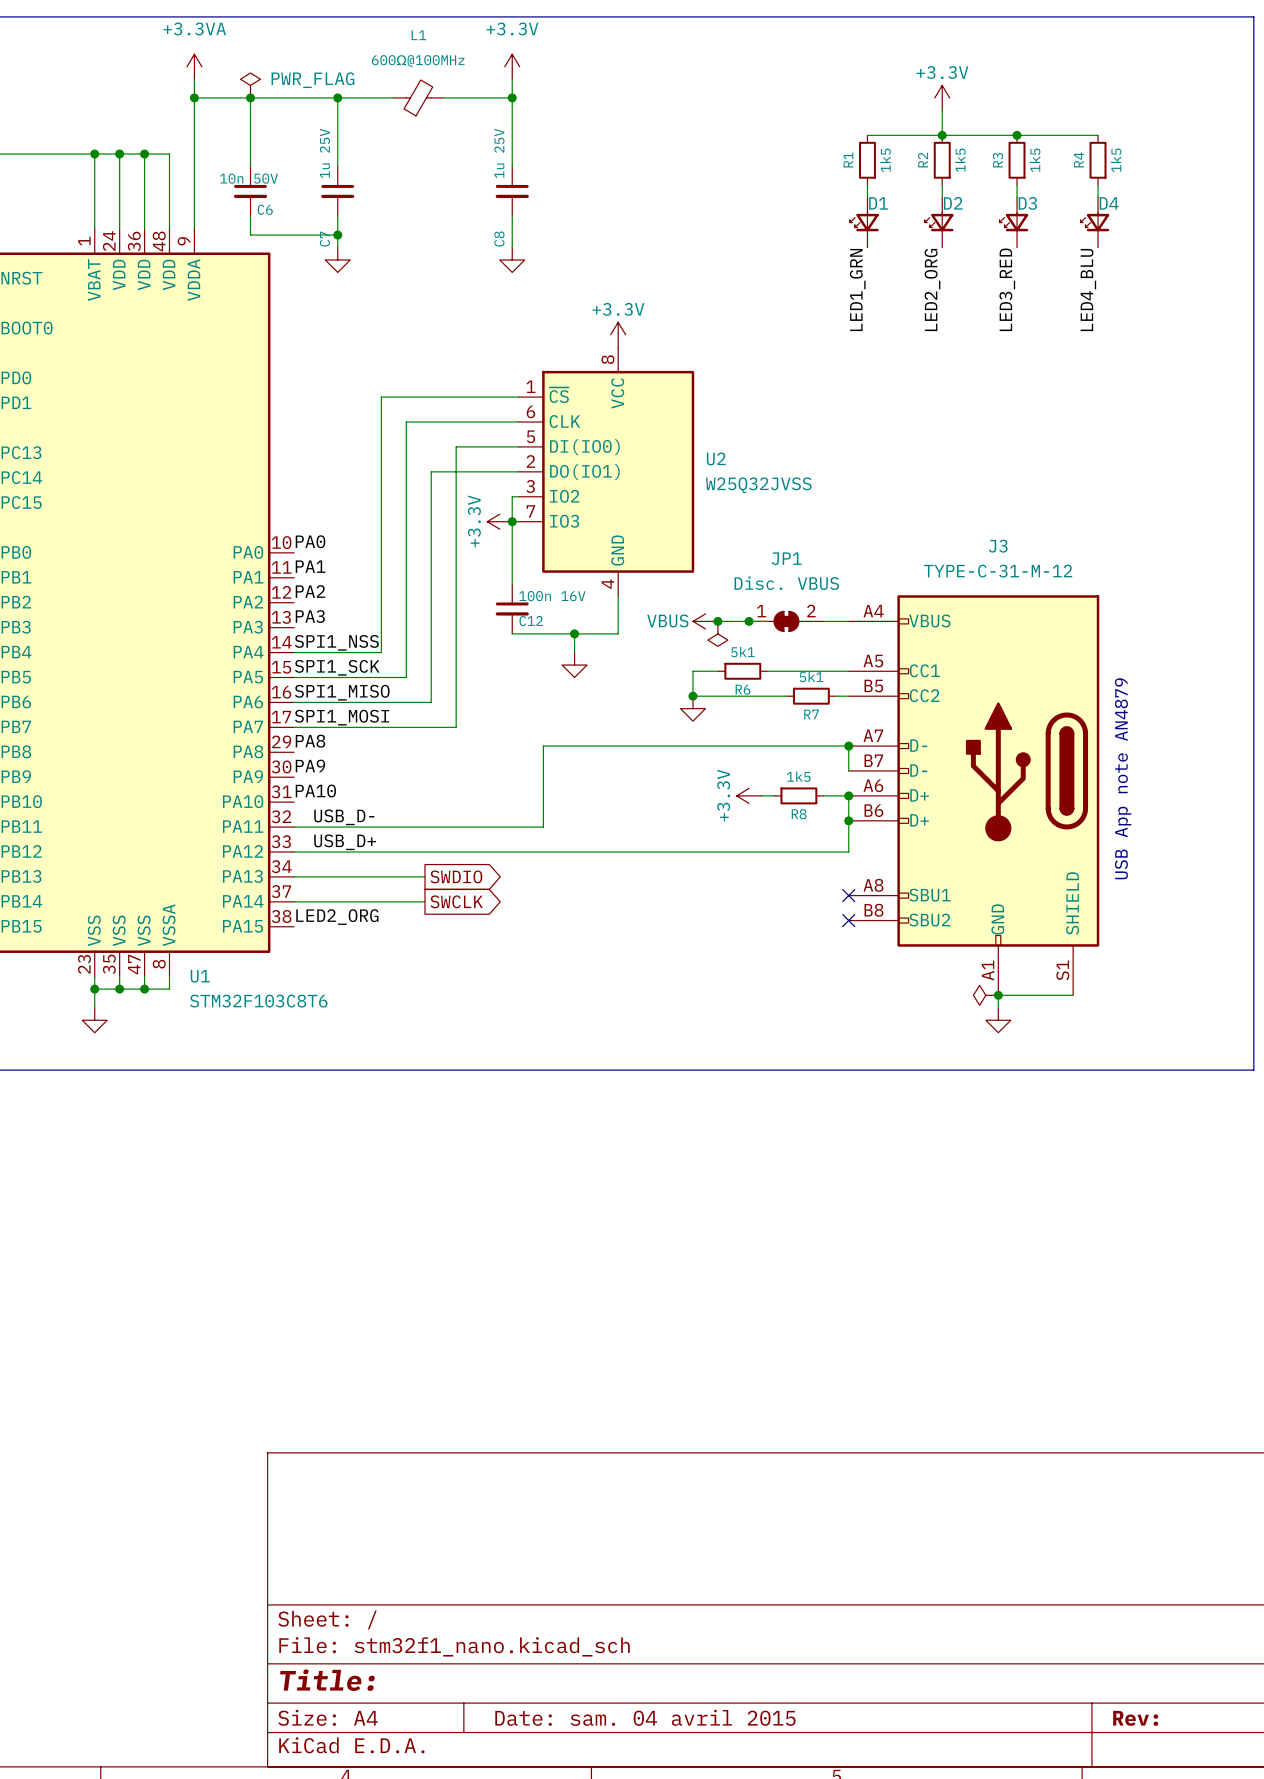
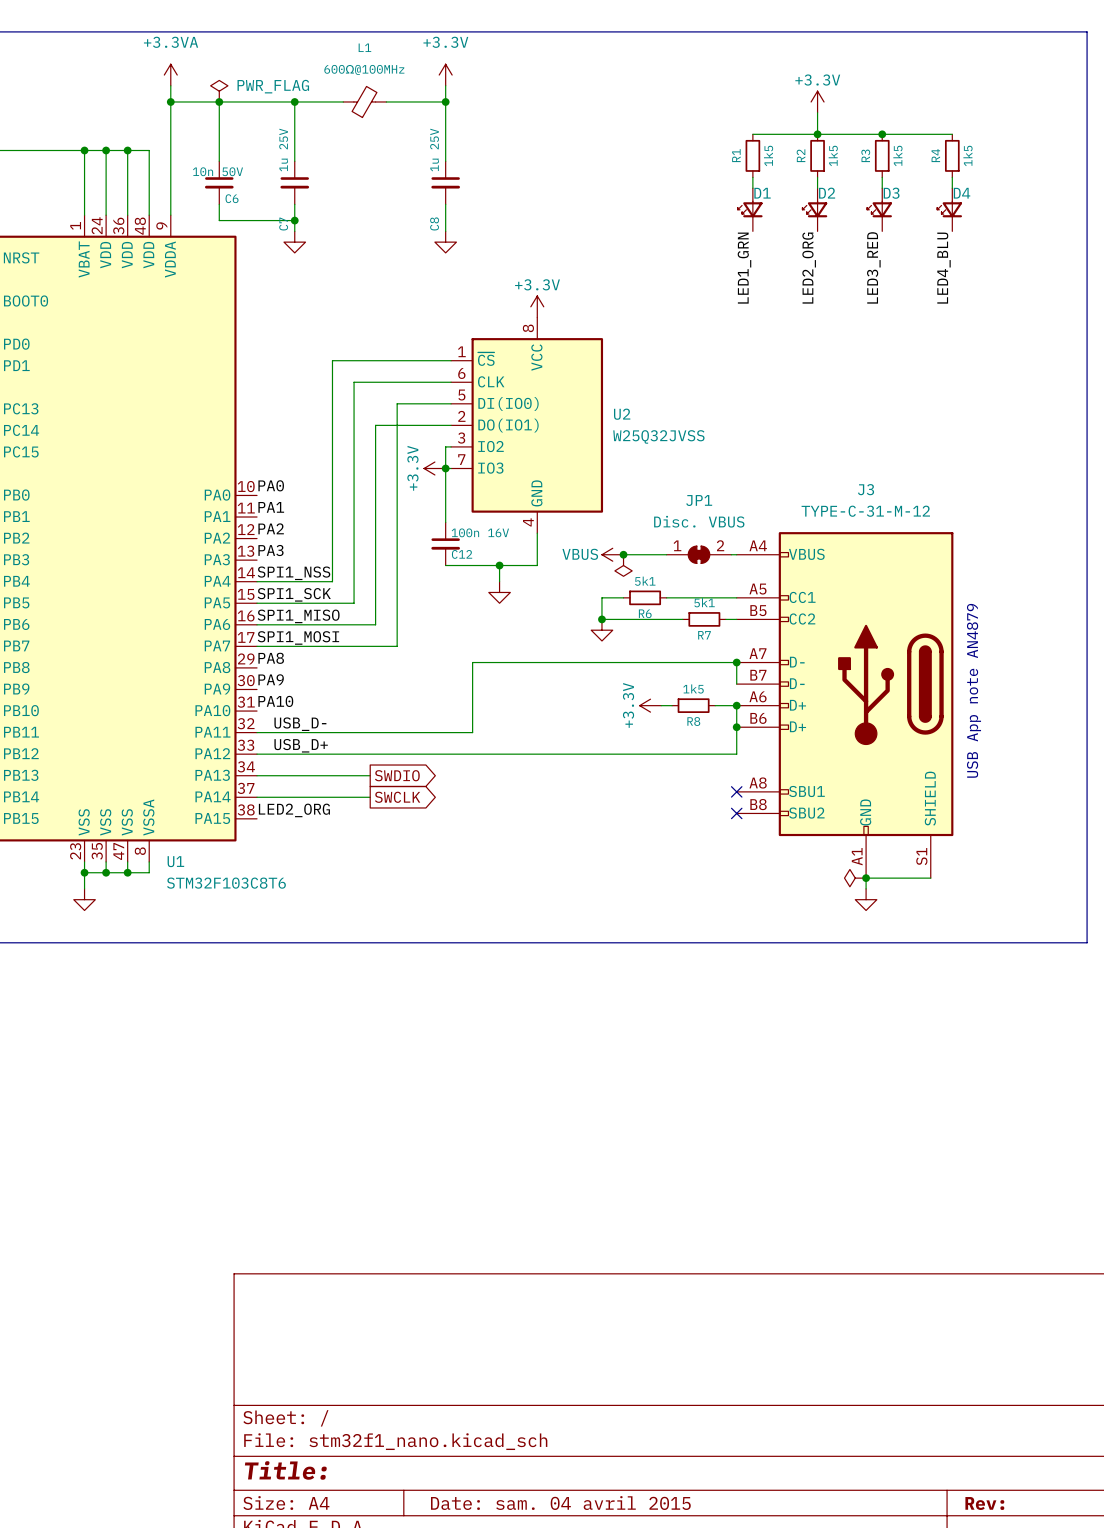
junction: (749, 621) -> none
JP1 position: (786, 621) -> (698, 554)

